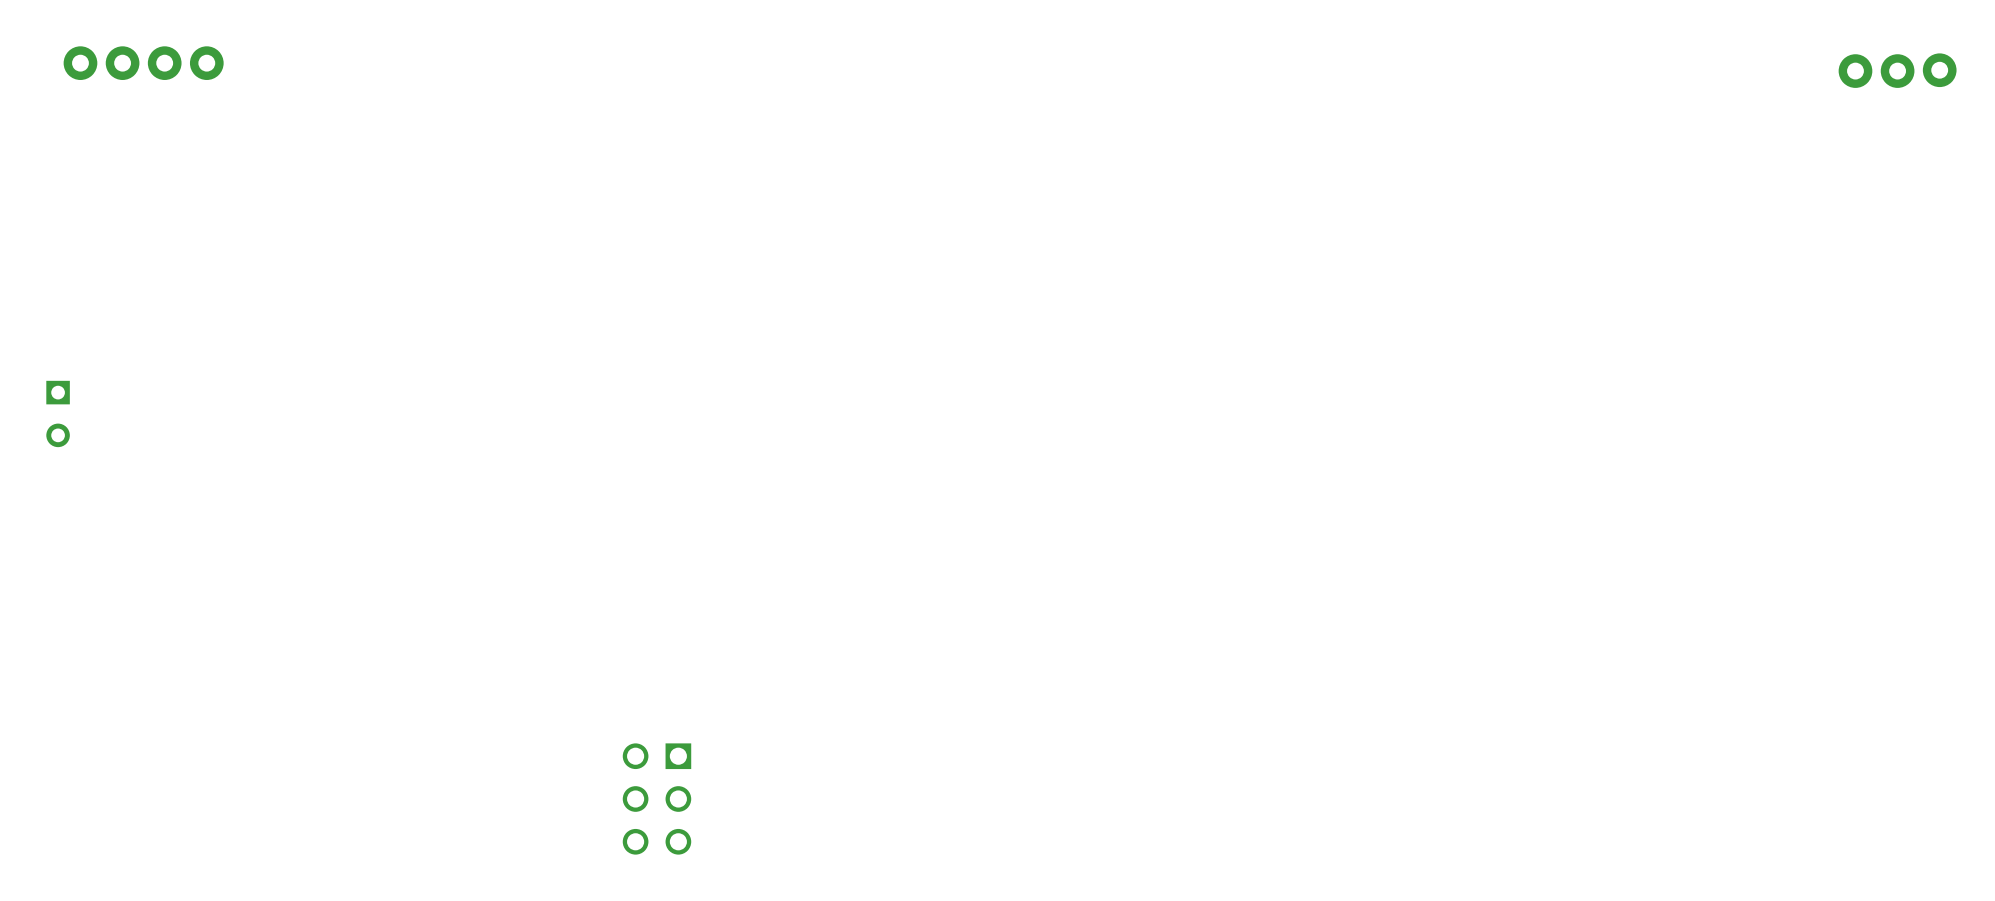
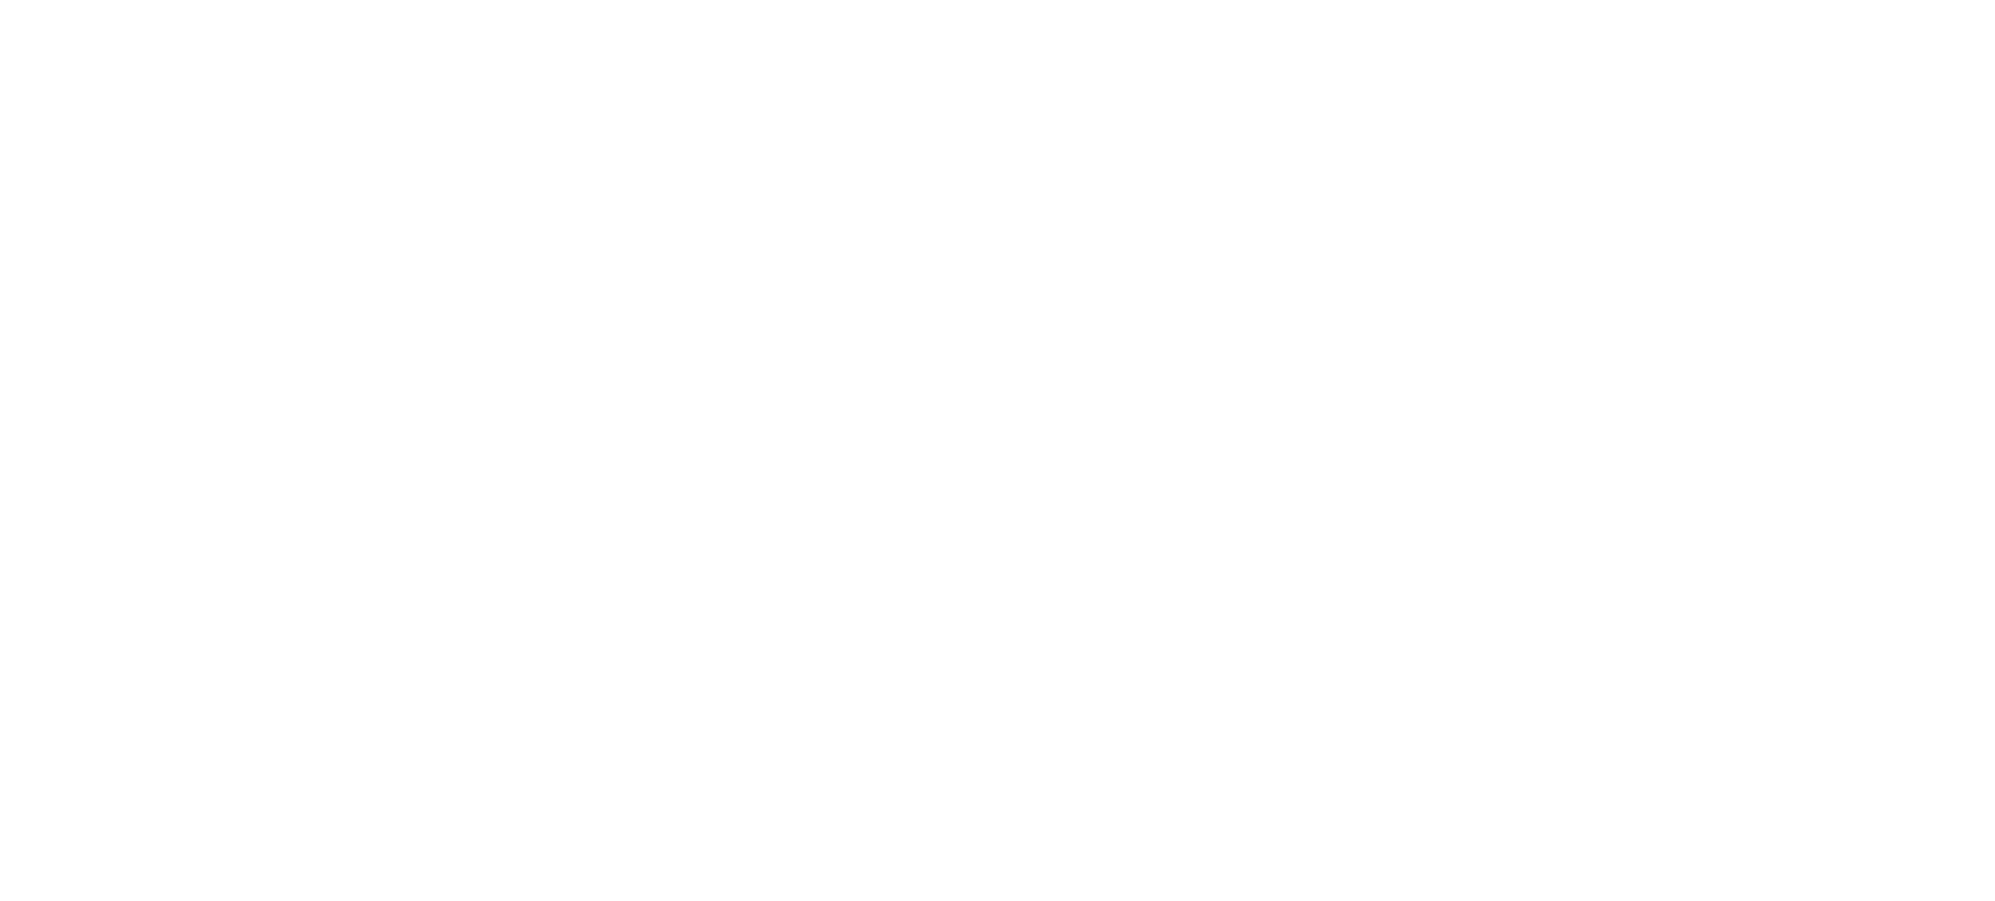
part: (143, 63) -> none
part: (1897, 70) -> none
part: (58, 413) -> none
part: (656, 798) -> none

